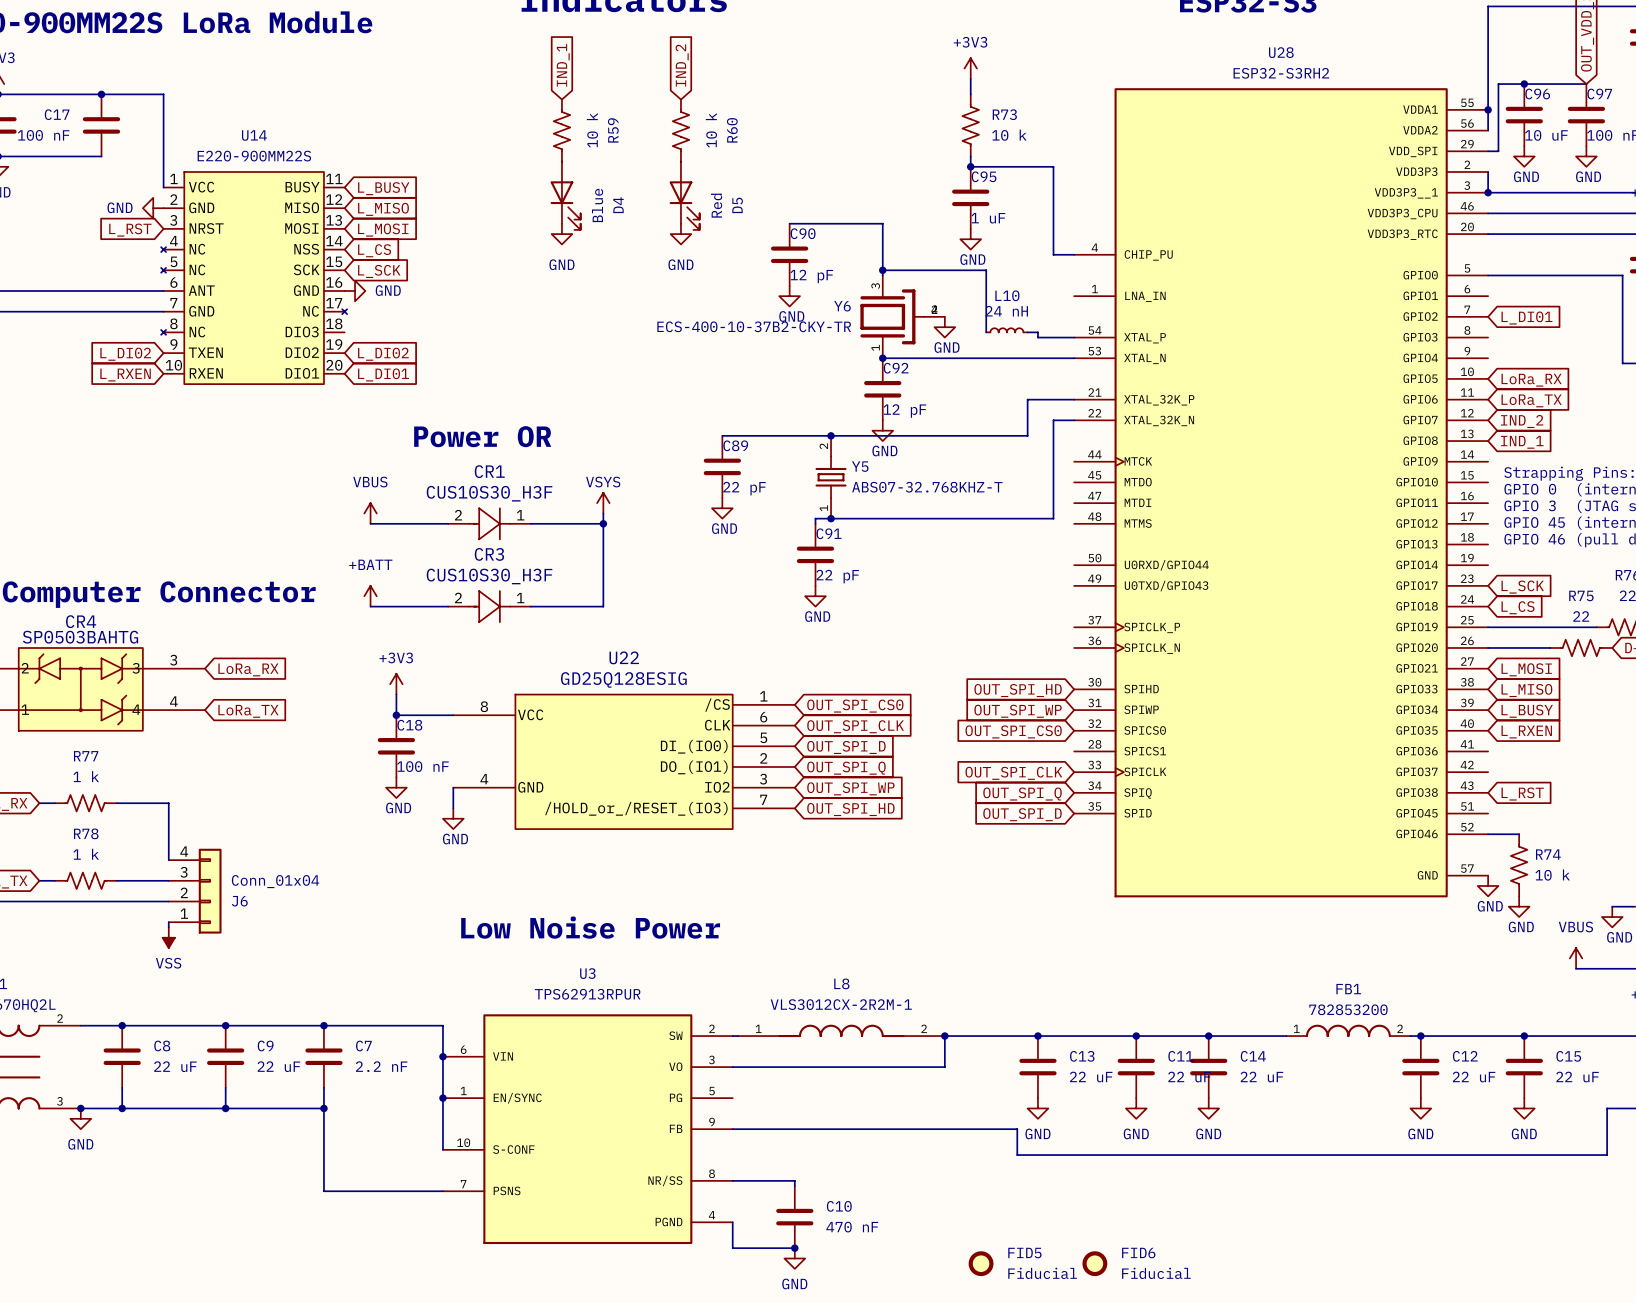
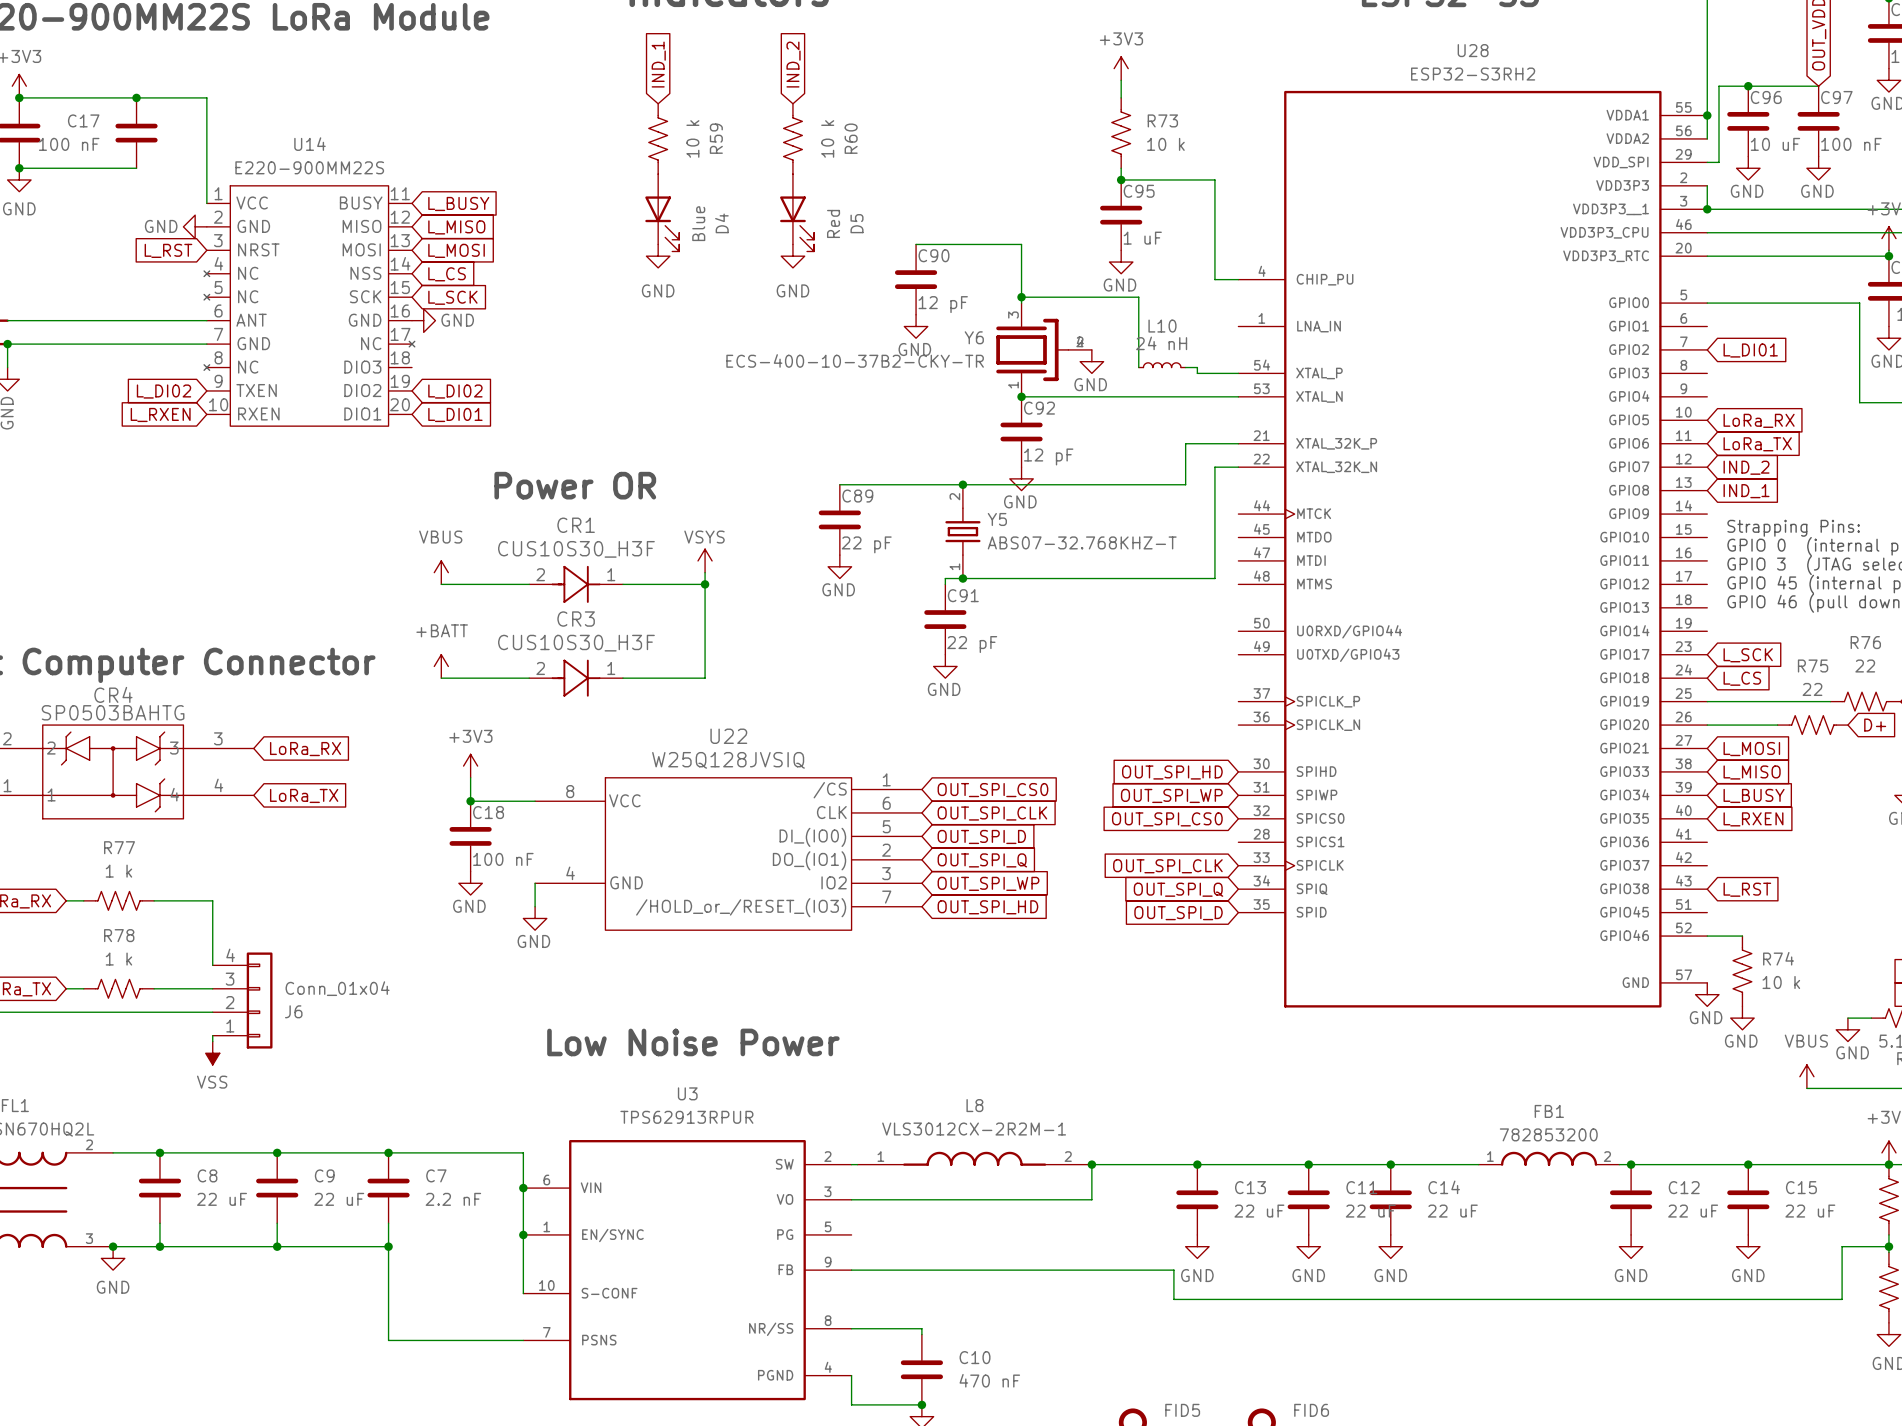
U22 value: GD25Q128ESIG (623, 679) -> W25Q128JVSIQ (728, 760)

